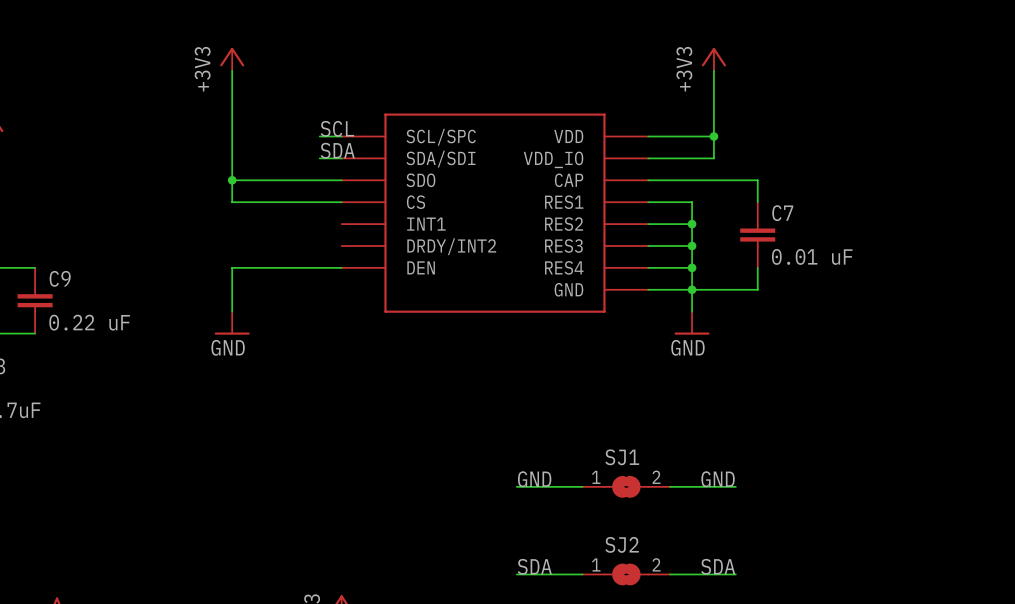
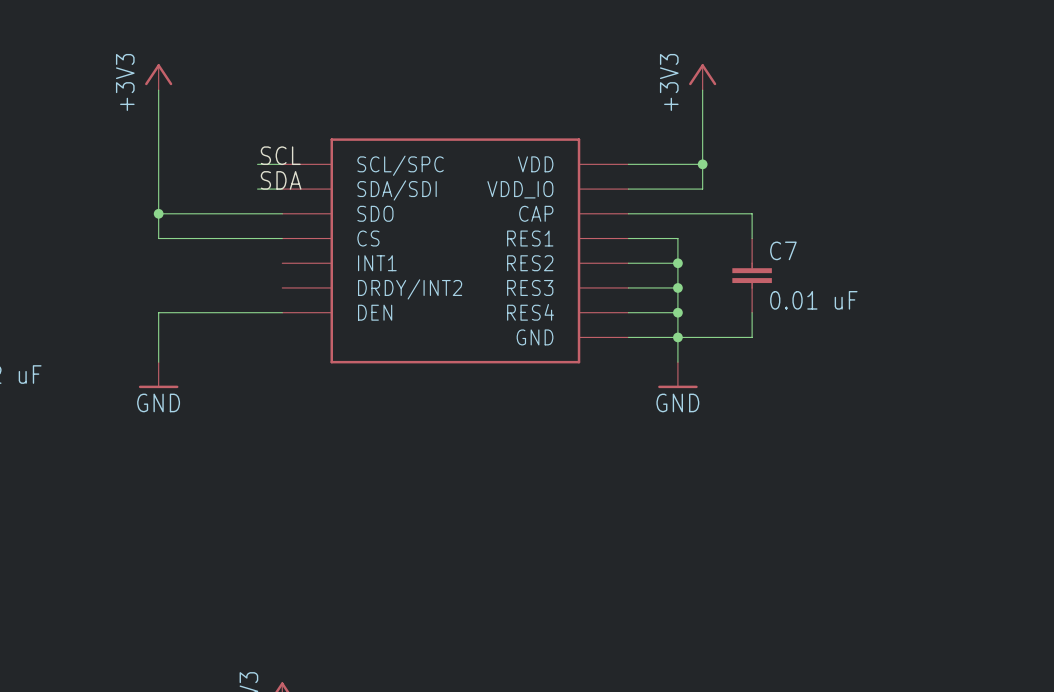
label: GND (534, 479) -> none
label: GND (718, 479) -> none
wire: (516, 486) (582, 486) -> none
SJ1: (626, 486) -> none
wire: (670, 486) (735, 486) -> none
label: SDA (534, 566) -> none
label: SDA (718, 566) -> none
wire: (516, 574) (582, 574) -> none
SJ2: (626, 574) -> none
wire: (670, 574) (735, 574) -> none

